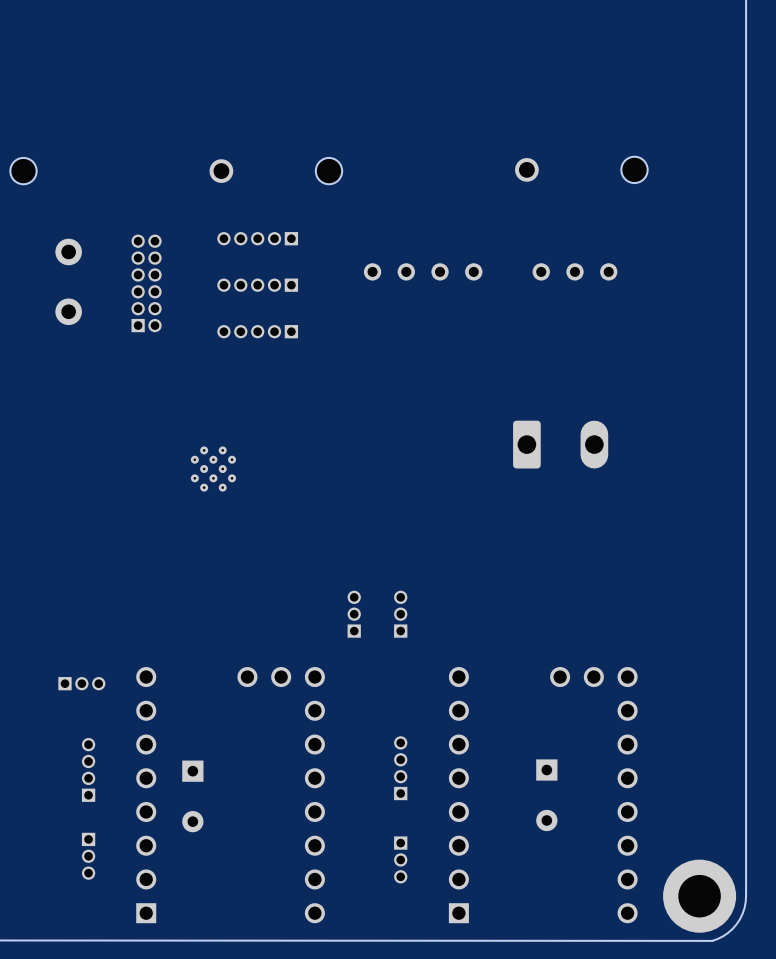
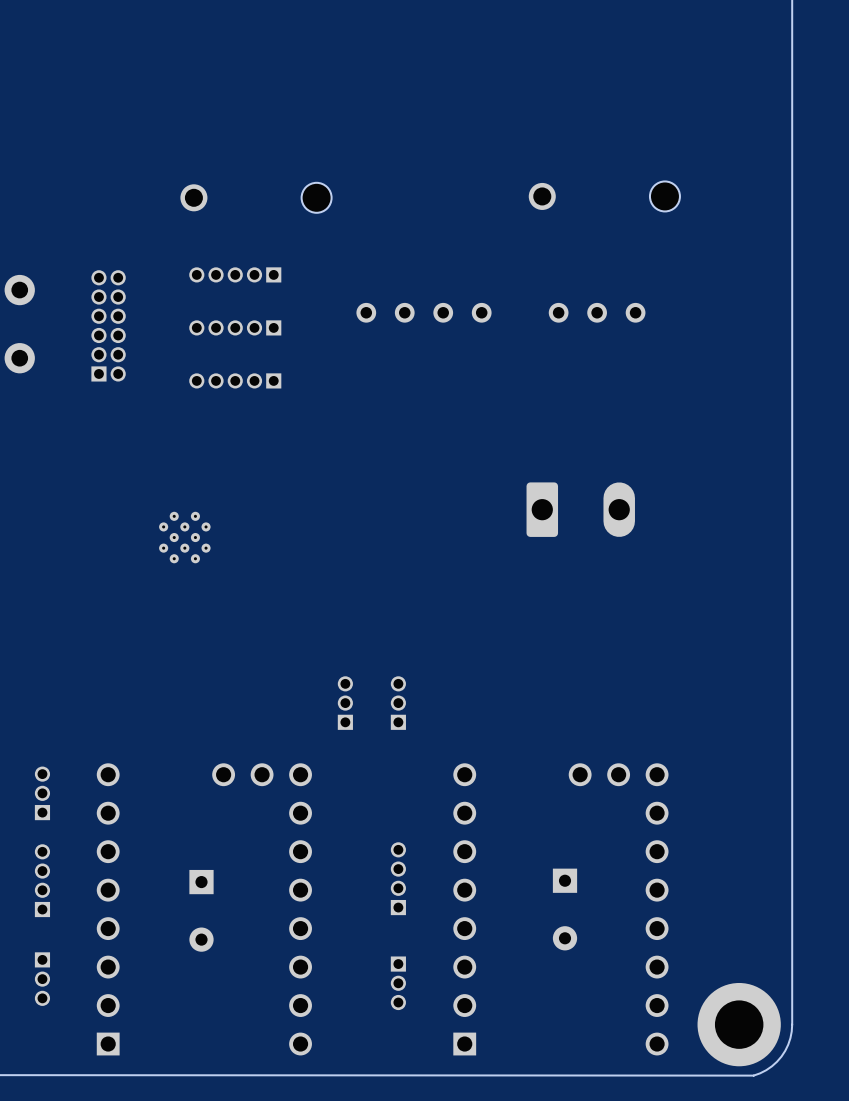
part rotation: 0° (81, 683) -> 90° counterclockwise (42, 793)
part position: (192, 796) -> (201, 910)

